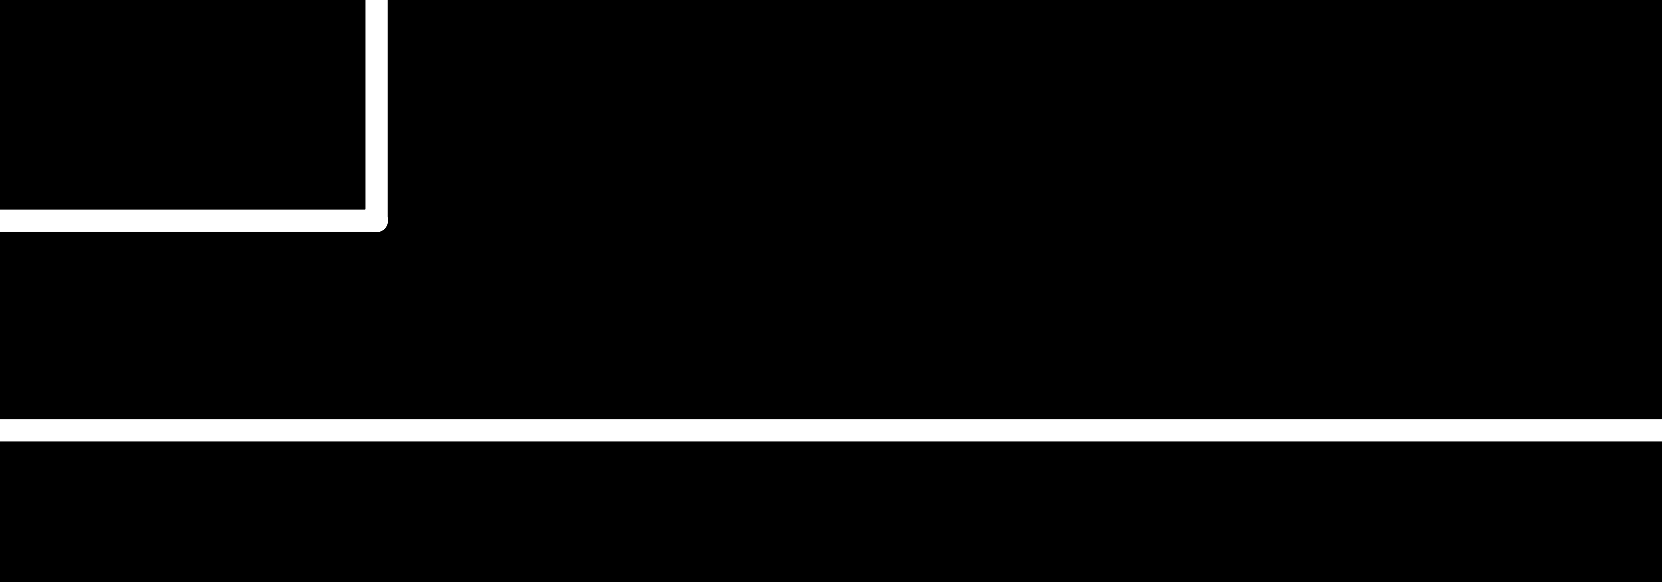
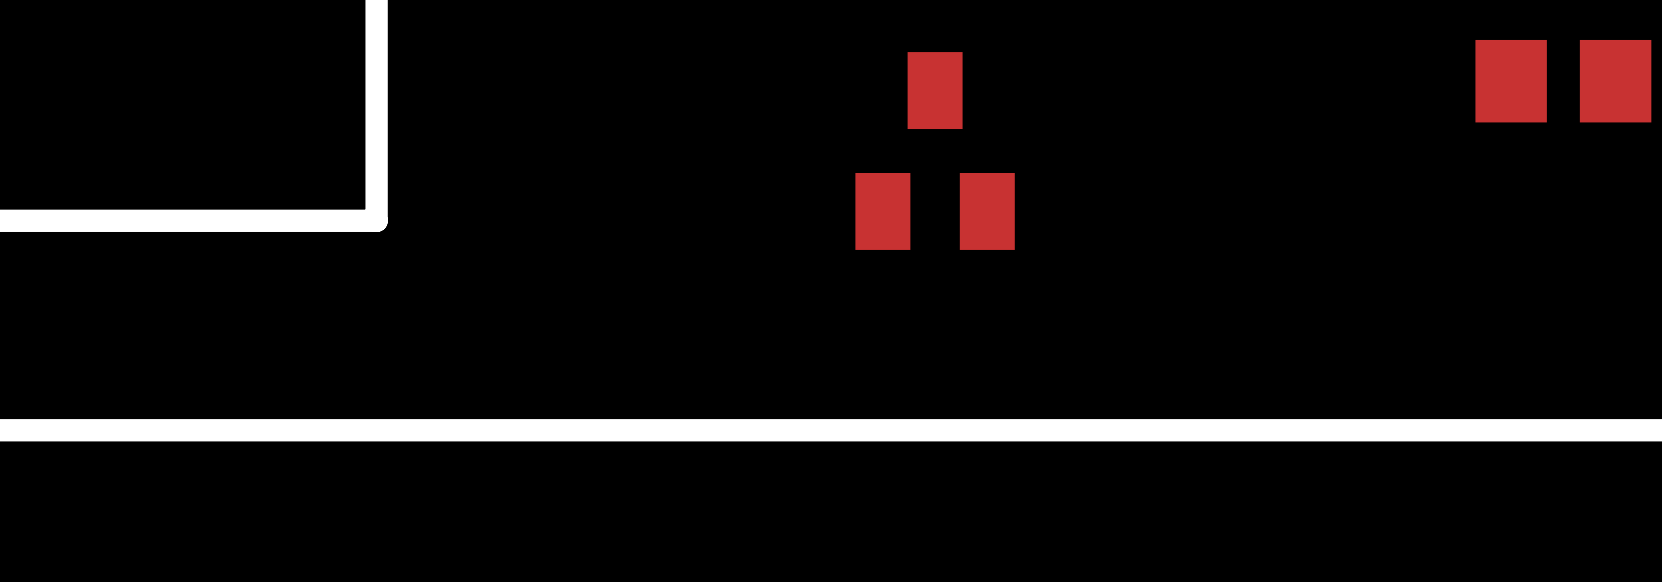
part: none -> (1563, 81)
part: none -> (935, 151)

